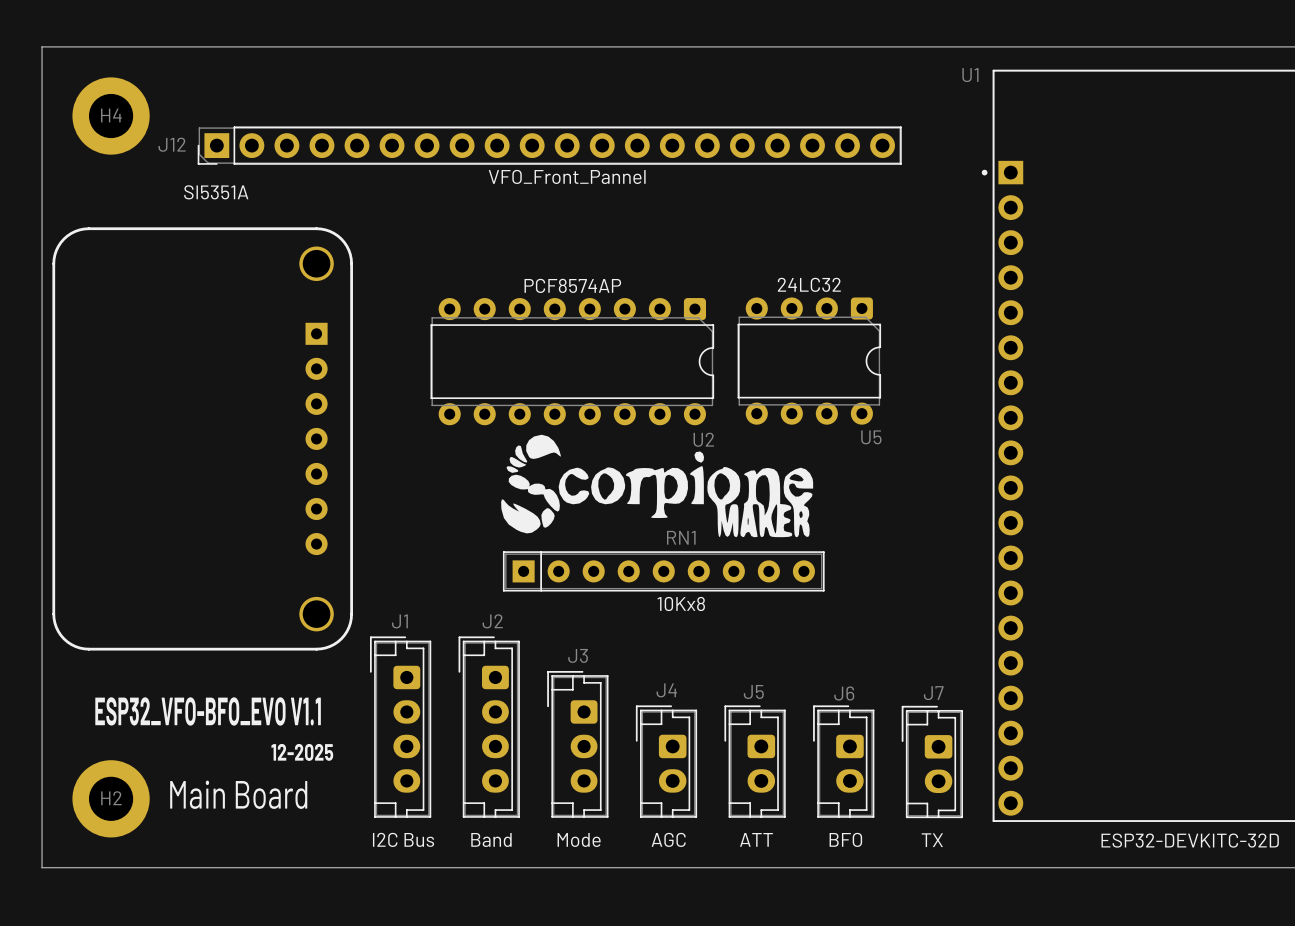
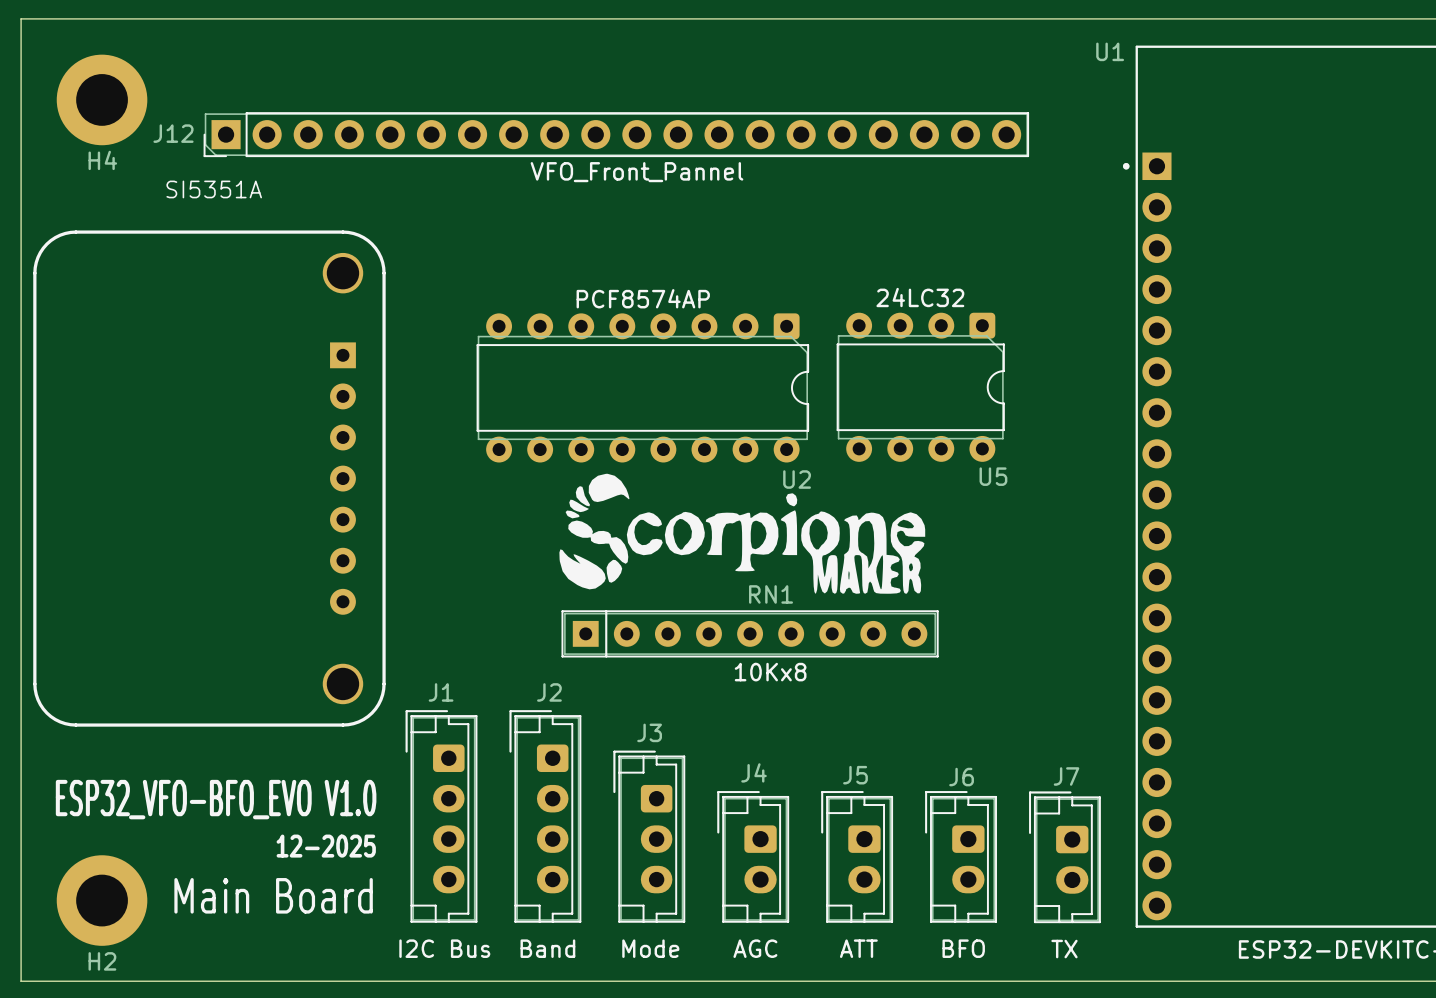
H4 name position: H4 (111, 115) -> H4 (102, 160)
text: ESP32_VFO-BFO_EVO V1.1 (208, 711) -> ESP32_VFO-BFO_EVO V1.0 (216, 799)
H2 name position: H2 (111, 798) -> H2 (102, 961)

